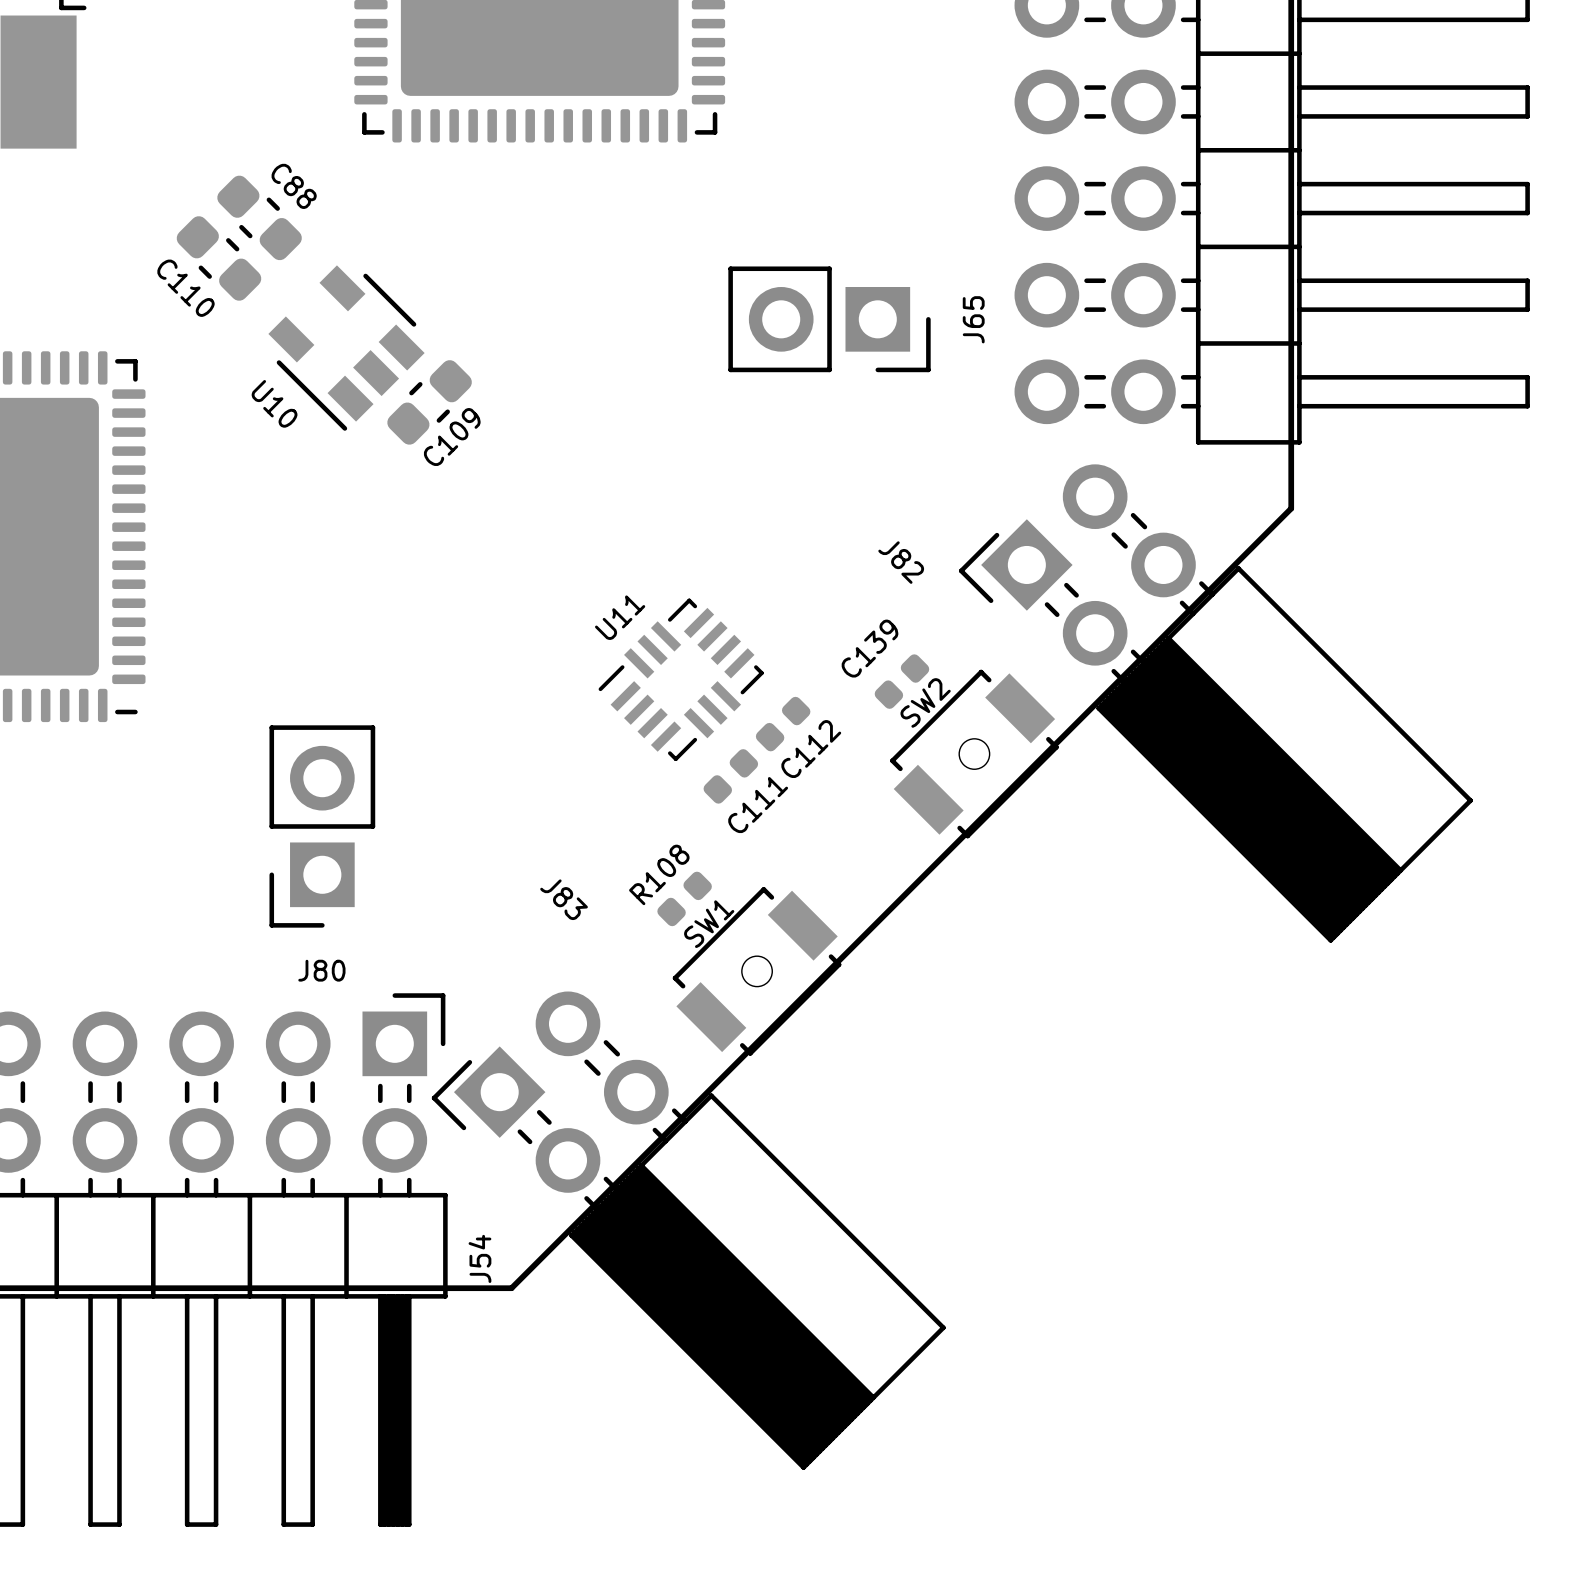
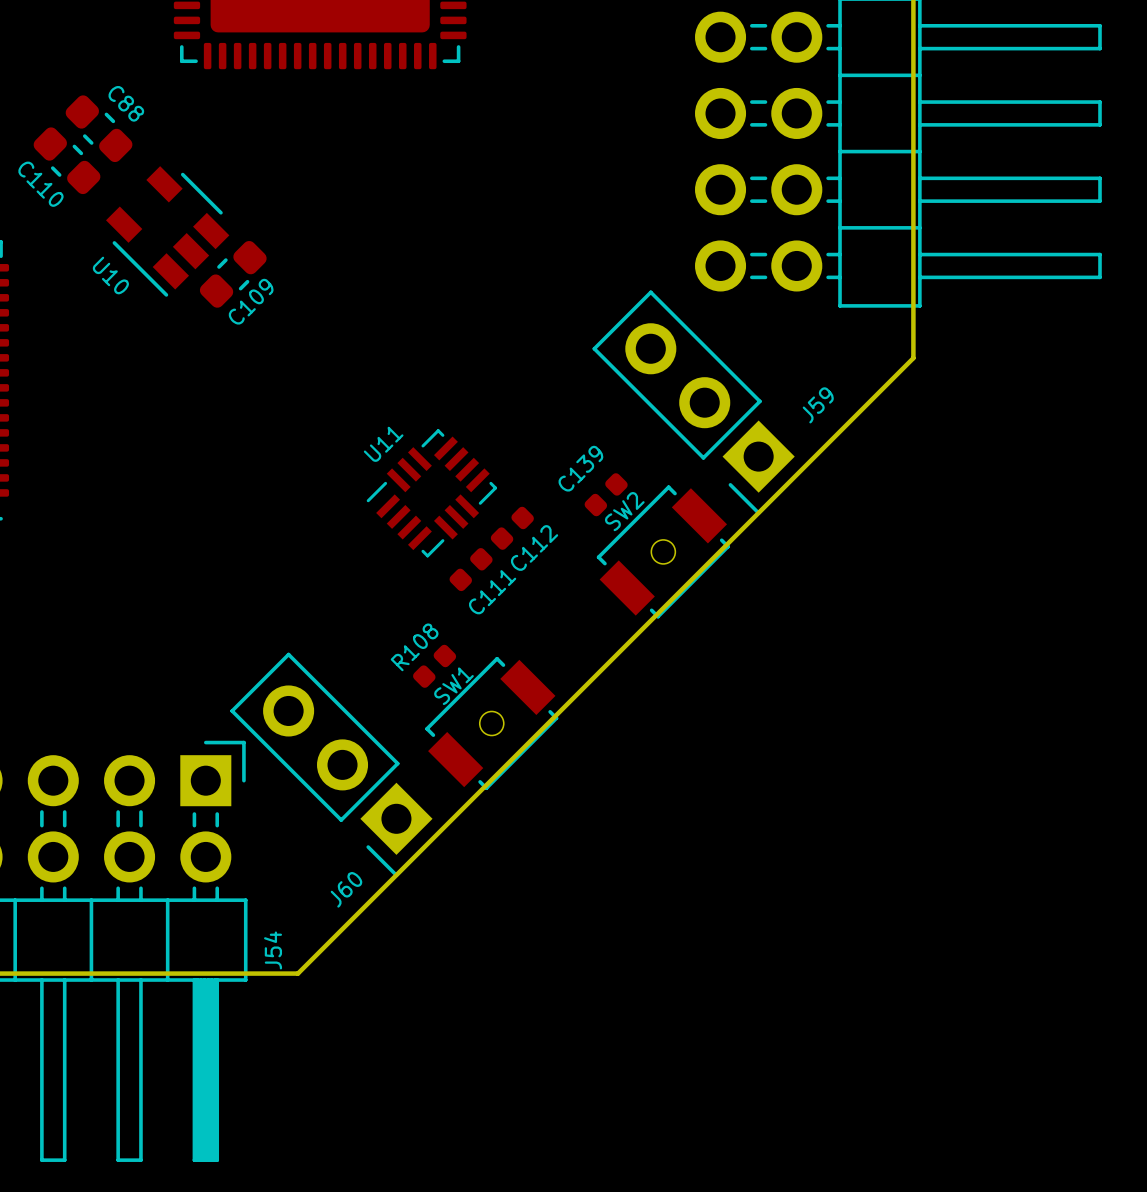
J65: (829, 319) -> none
J59: none -> (693, 402)
J82: (1215, 703) -> none
J80: (322, 826) -> none
J60: none -> (331, 764)
J83: (688, 1230) -> none

